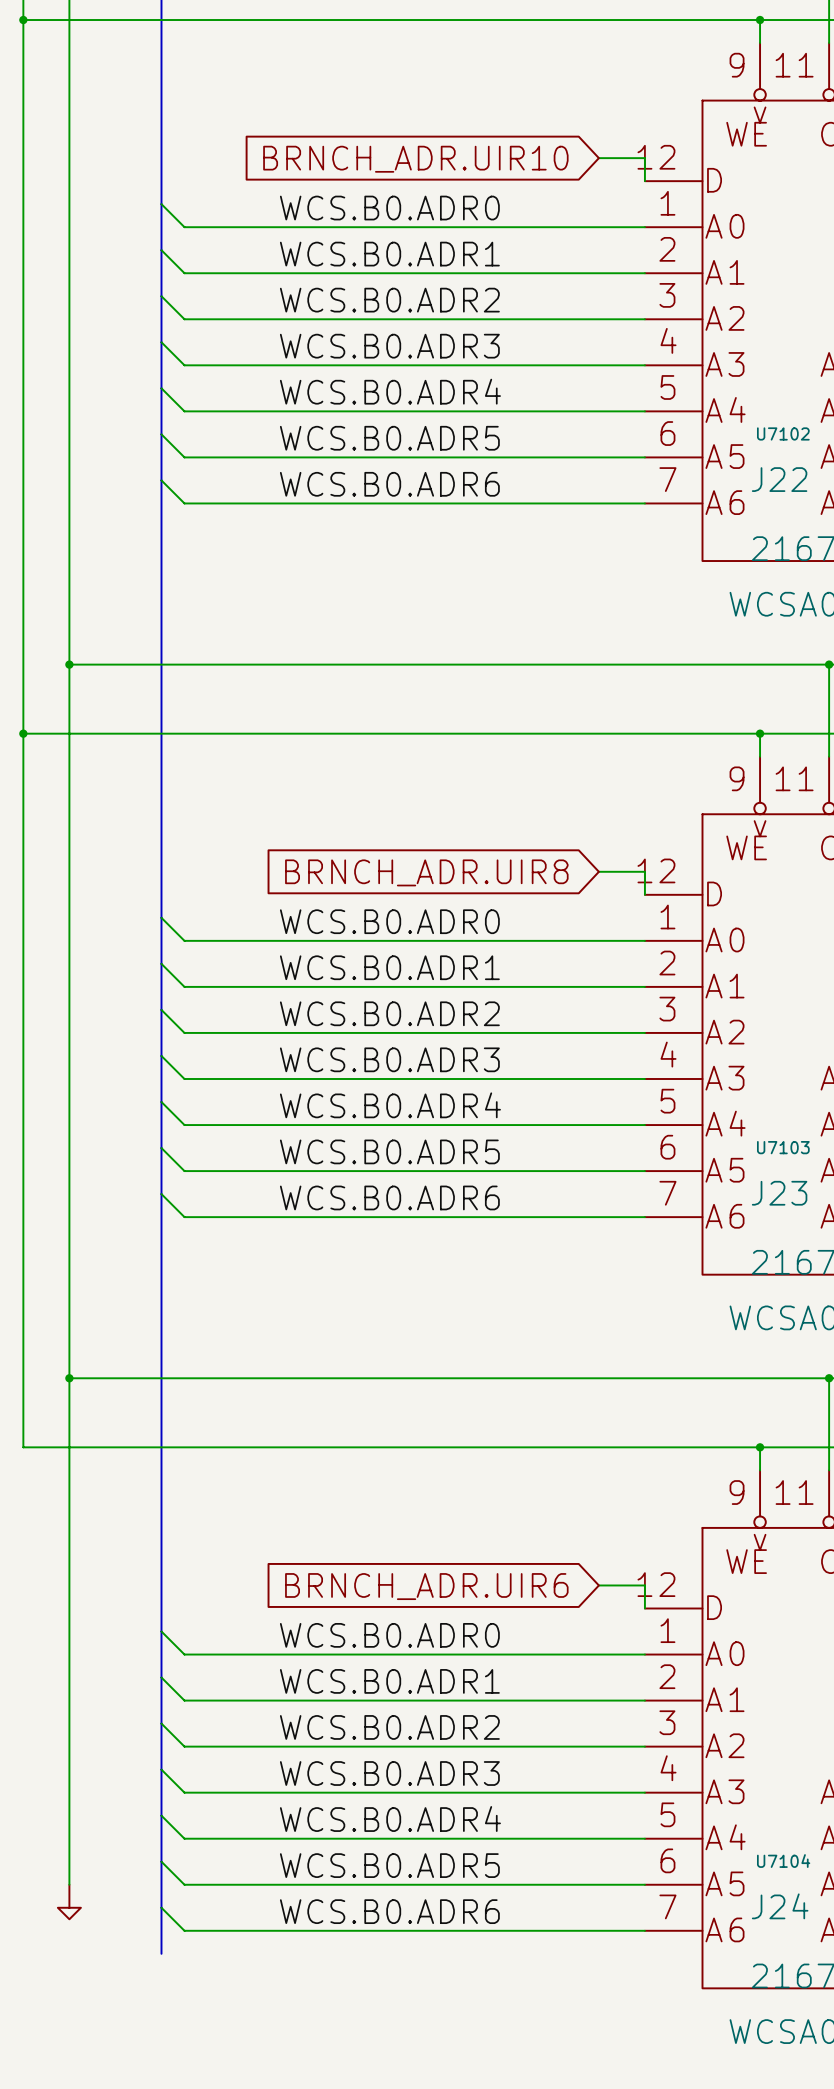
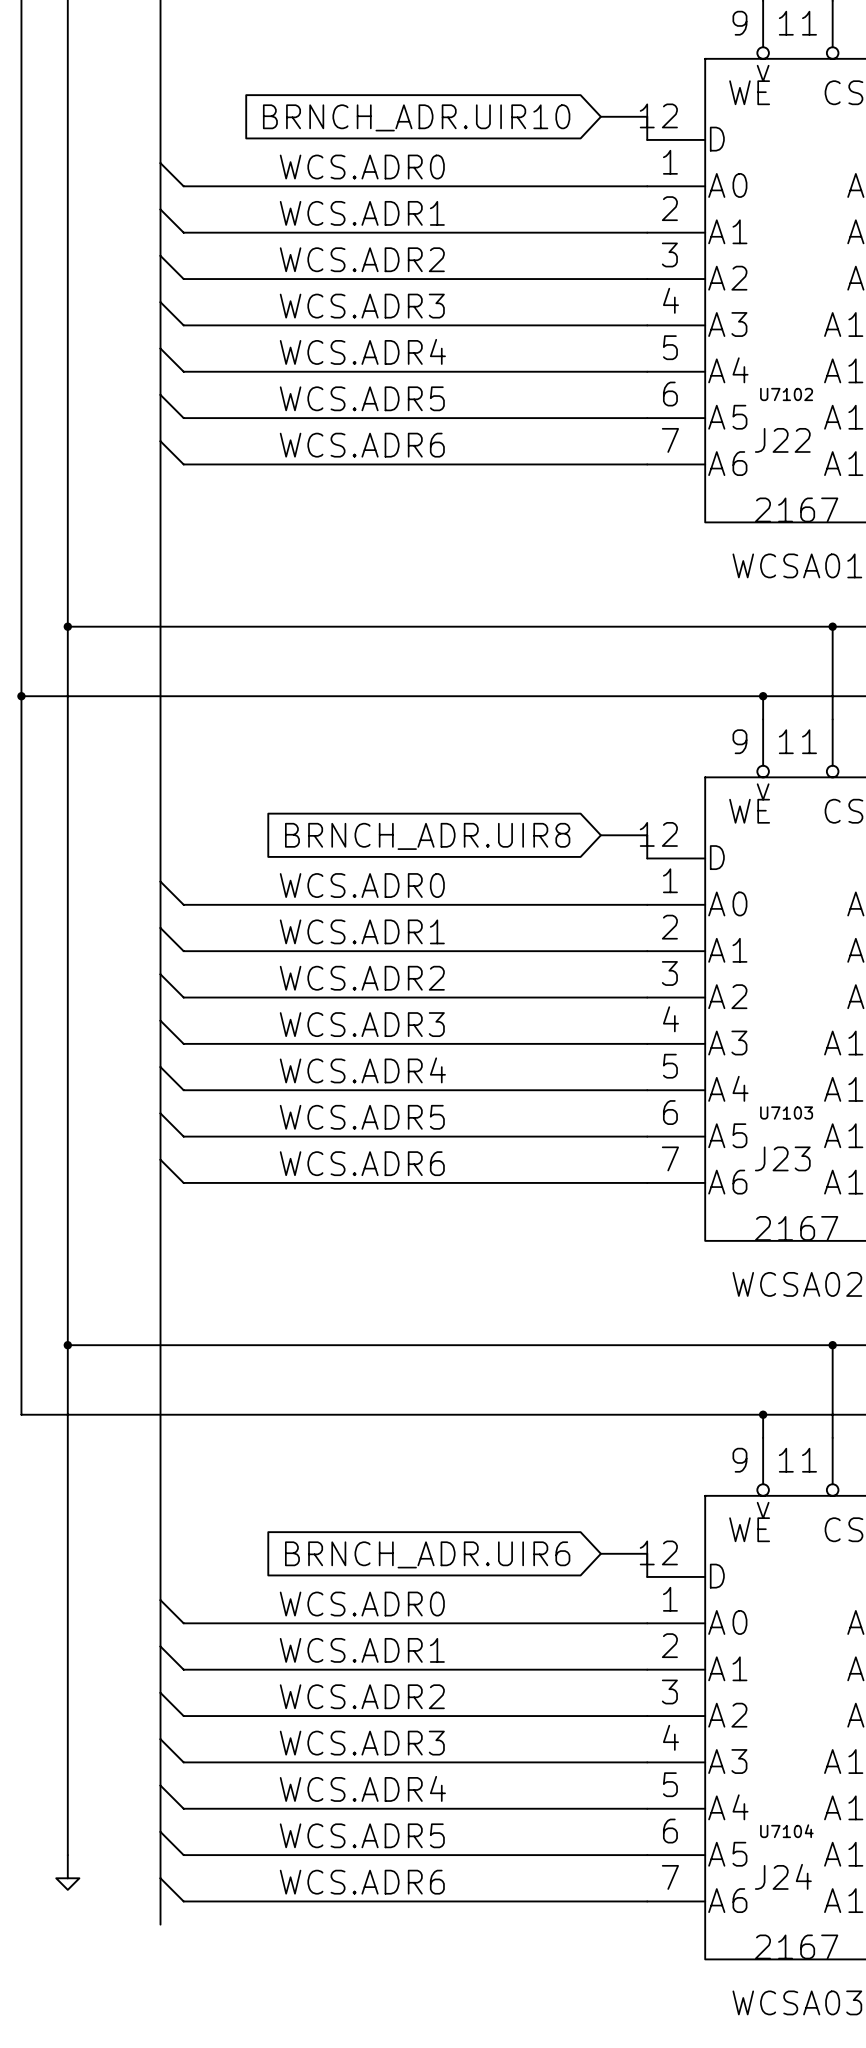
label: WCS.B0.ADR0 (389, 208) -> WCS.ADR0 (362, 167)
label: WCS.B0.ADR1 (389, 254) -> WCS.ADR1 (362, 213)
label: WCS.B0.ADR2 (389, 300) -> WCS.ADR2 (362, 259)
label: WCS.B0.ADR3 (389, 346) -> WCS.ADR3 (362, 306)
label: WCS.B0.ADR4 (390, 391) -> WCS.ADR4 (362, 351)
label: WCS.B0.ADR5 (389, 438) -> WCS.ADR5 (362, 398)
label: WCS.B0.ADR6 (389, 484) -> WCS.ADR6 (362, 445)
label: WCS.B0.ADR0 (389, 921) -> WCS.ADR0 (362, 885)
label: WCS.B0.ADR1 (389, 967) -> WCS.ADR1 (362, 931)
label: WCS.B0.ADR2 (389, 1013) -> WCS.ADR2 (362, 978)
label: WCS.B0.ADR3 (389, 1059) -> WCS.ADR3 (362, 1024)
label: WCS.B0.ADR4 (390, 1105) -> WCS.ADR4 (362, 1070)
label: WCS.B0.ADR5 (389, 1151) -> WCS.ADR5 (362, 1117)
label: WCS.B0.ADR6 (389, 1197) -> WCS.ADR6 (362, 1163)
label: WCS.B0.ADR0 (389, 1635) -> WCS.ADR0 (362, 1604)
label: WCS.B0.ADR1 (389, 1681) -> WCS.ADR1 (362, 1650)
label: WCS.B0.ADR2 (389, 1727) -> WCS.ADR2 (362, 1696)
label: WCS.B0.ADR3 (389, 1773) -> WCS.ADR3 (362, 1743)
label: WCS.B0.ADR4 (390, 1819) -> WCS.ADR4 (362, 1788)
label: WCS.B0.ADR5 (389, 1865) -> WCS.ADR5 (362, 1835)
label: WCS.B0.ADR6 (389, 1911) -> WCS.ADR6 (362, 1882)

